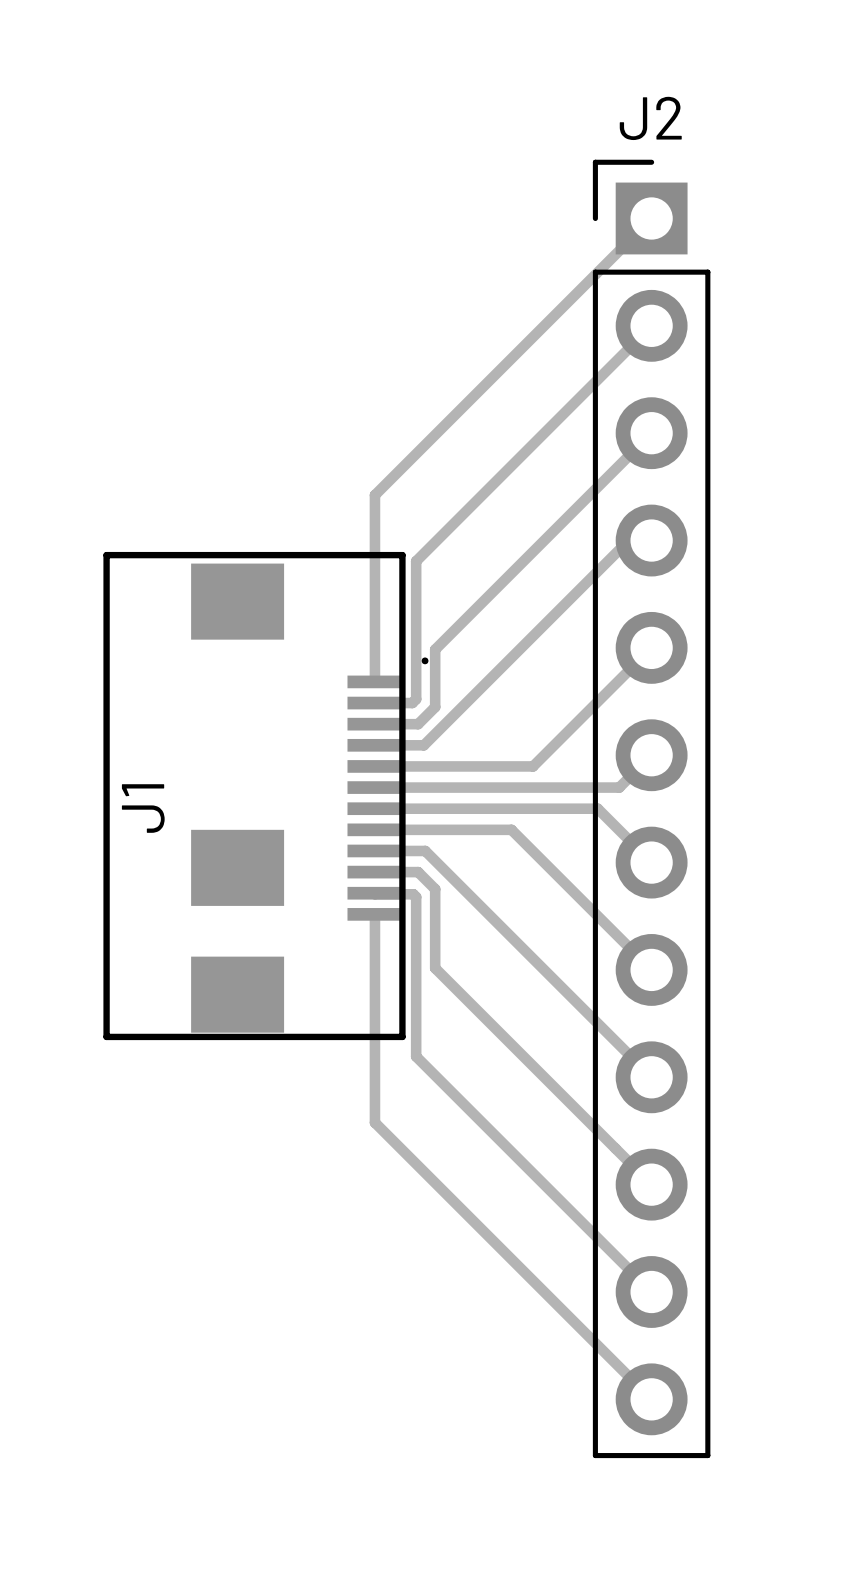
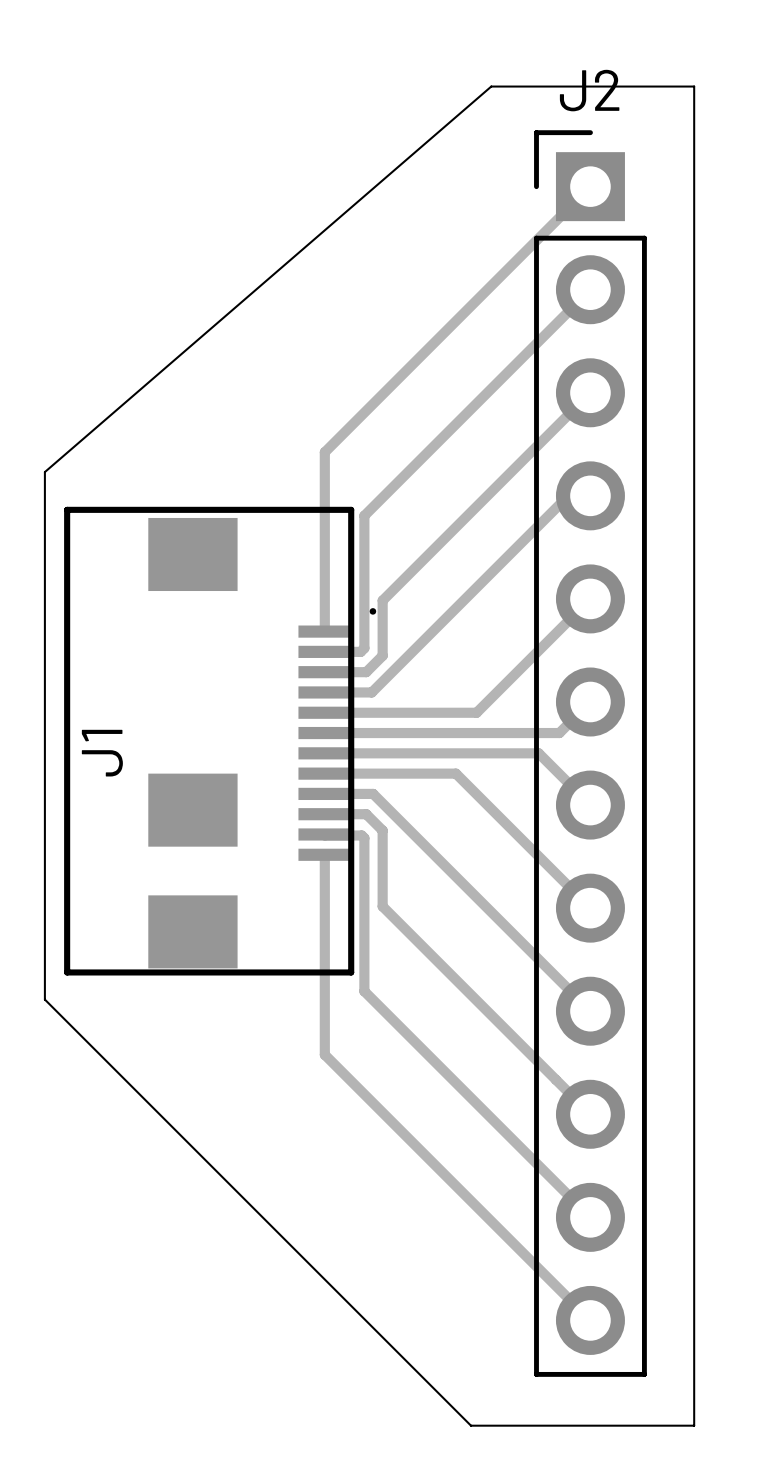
board edge: none -> (491, 86) (694, 86) (694, 1425) (470, 1425) (44, 999) (44, 472) (491, 86)

